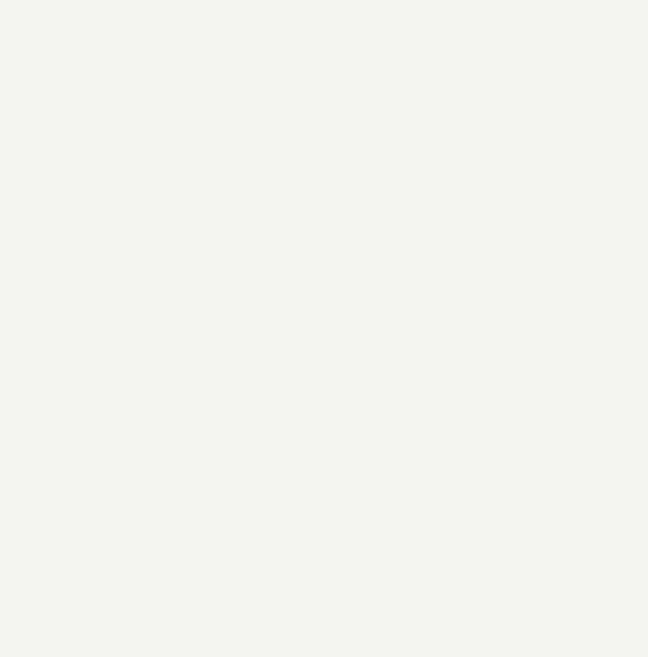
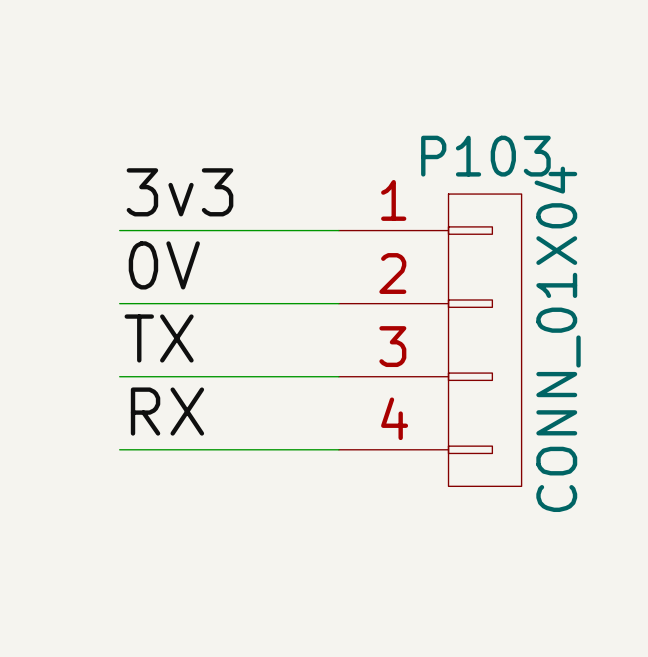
label: none -> 3v3 (179, 192)
wire: none -> (119, 230) (338, 230)
label: none -> 0V (164, 265)
wire: none -> (119, 303) (338, 303)
label: none -> TX (159, 338)
P103: none -> CONN_01X04 (430, 340)
wire: none -> (119, 376) (338, 376)
label: none -> RX (167, 411)
wire: none -> (119, 449) (338, 449)

